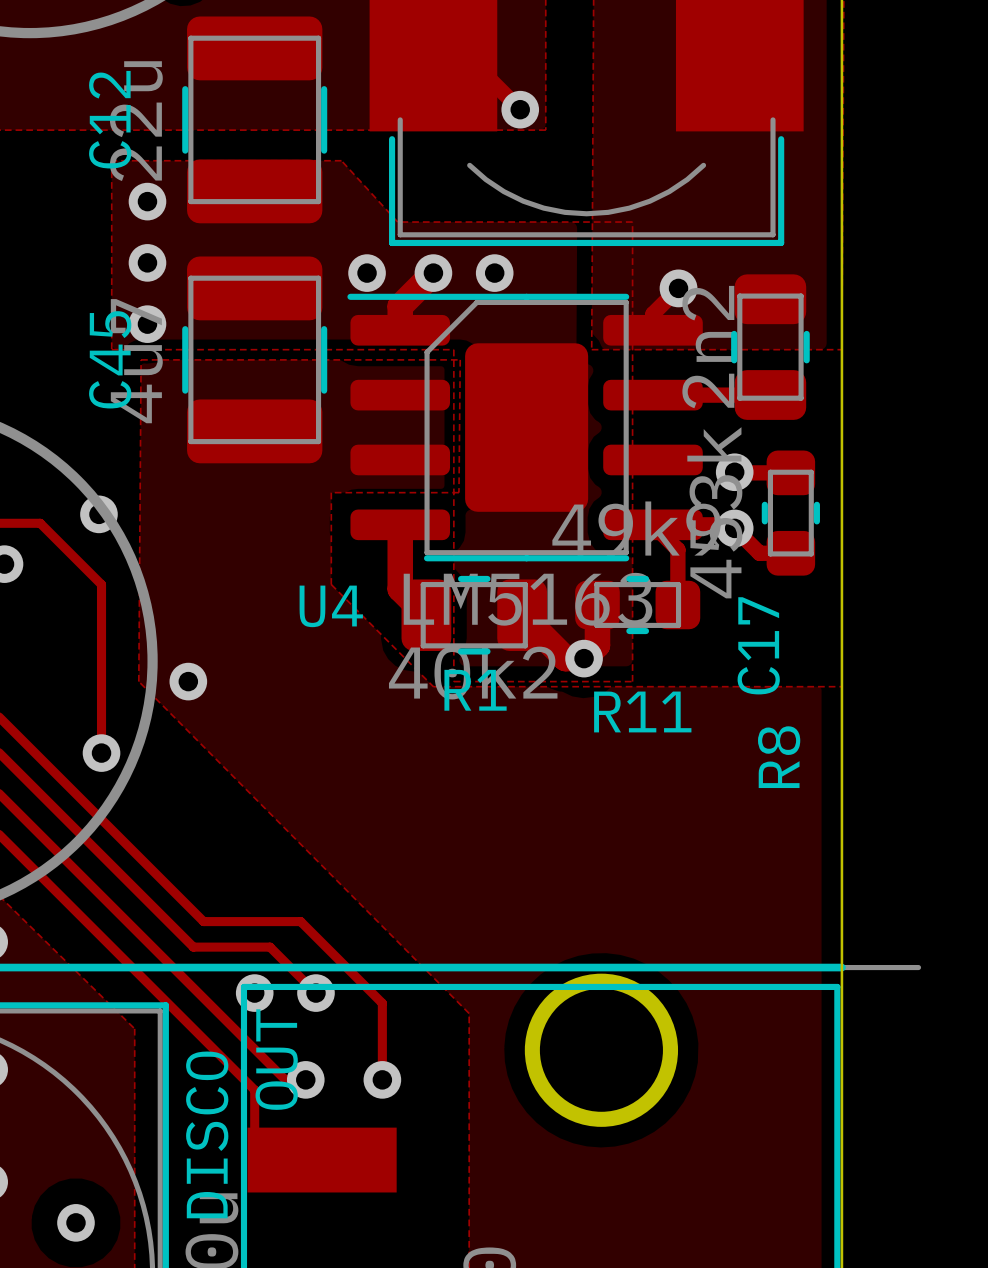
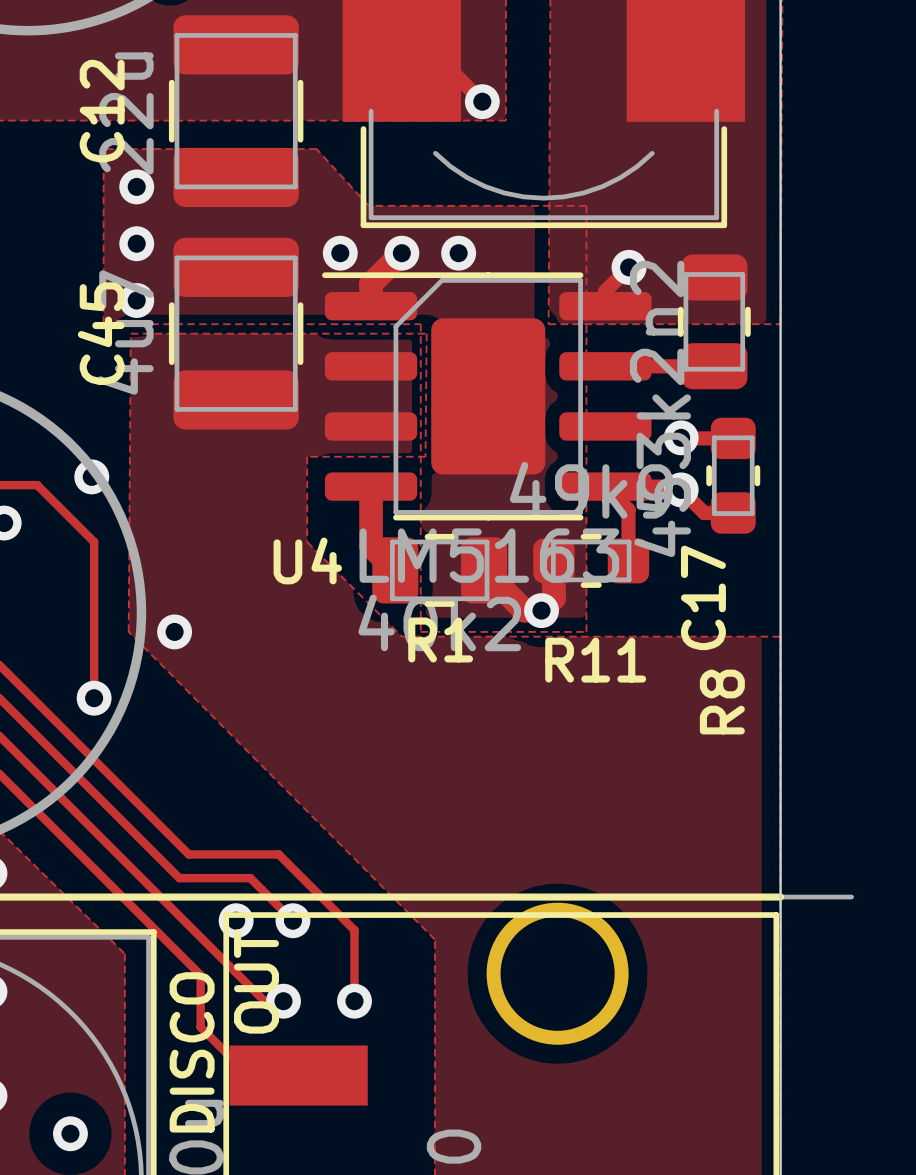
track: (216, 1051) (254, 1090) (254, 1146) -> (200, 975) (200, 1027) (236, 1062)

